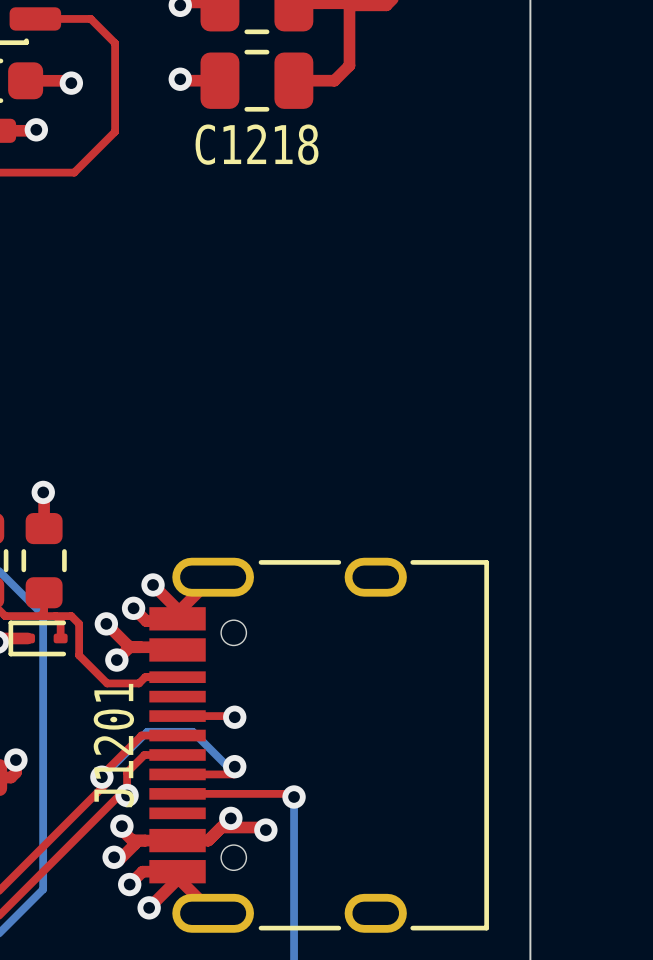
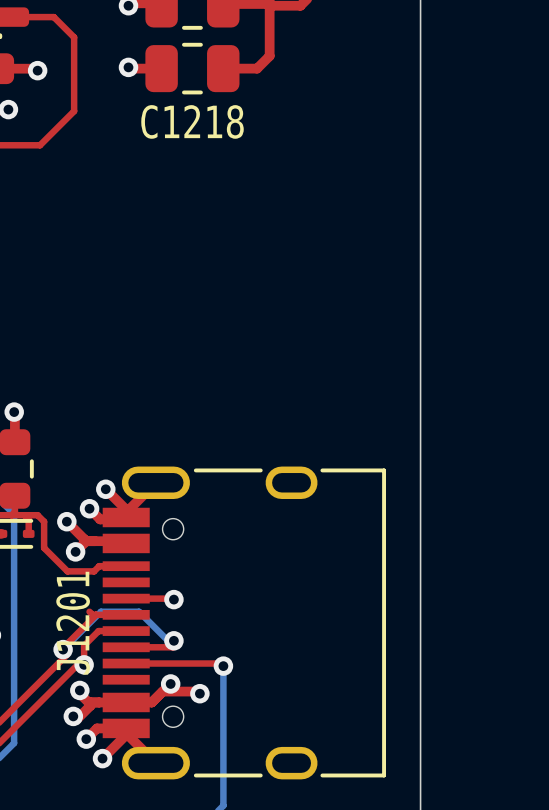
top track: none -> (89, 611) (96, 614)

